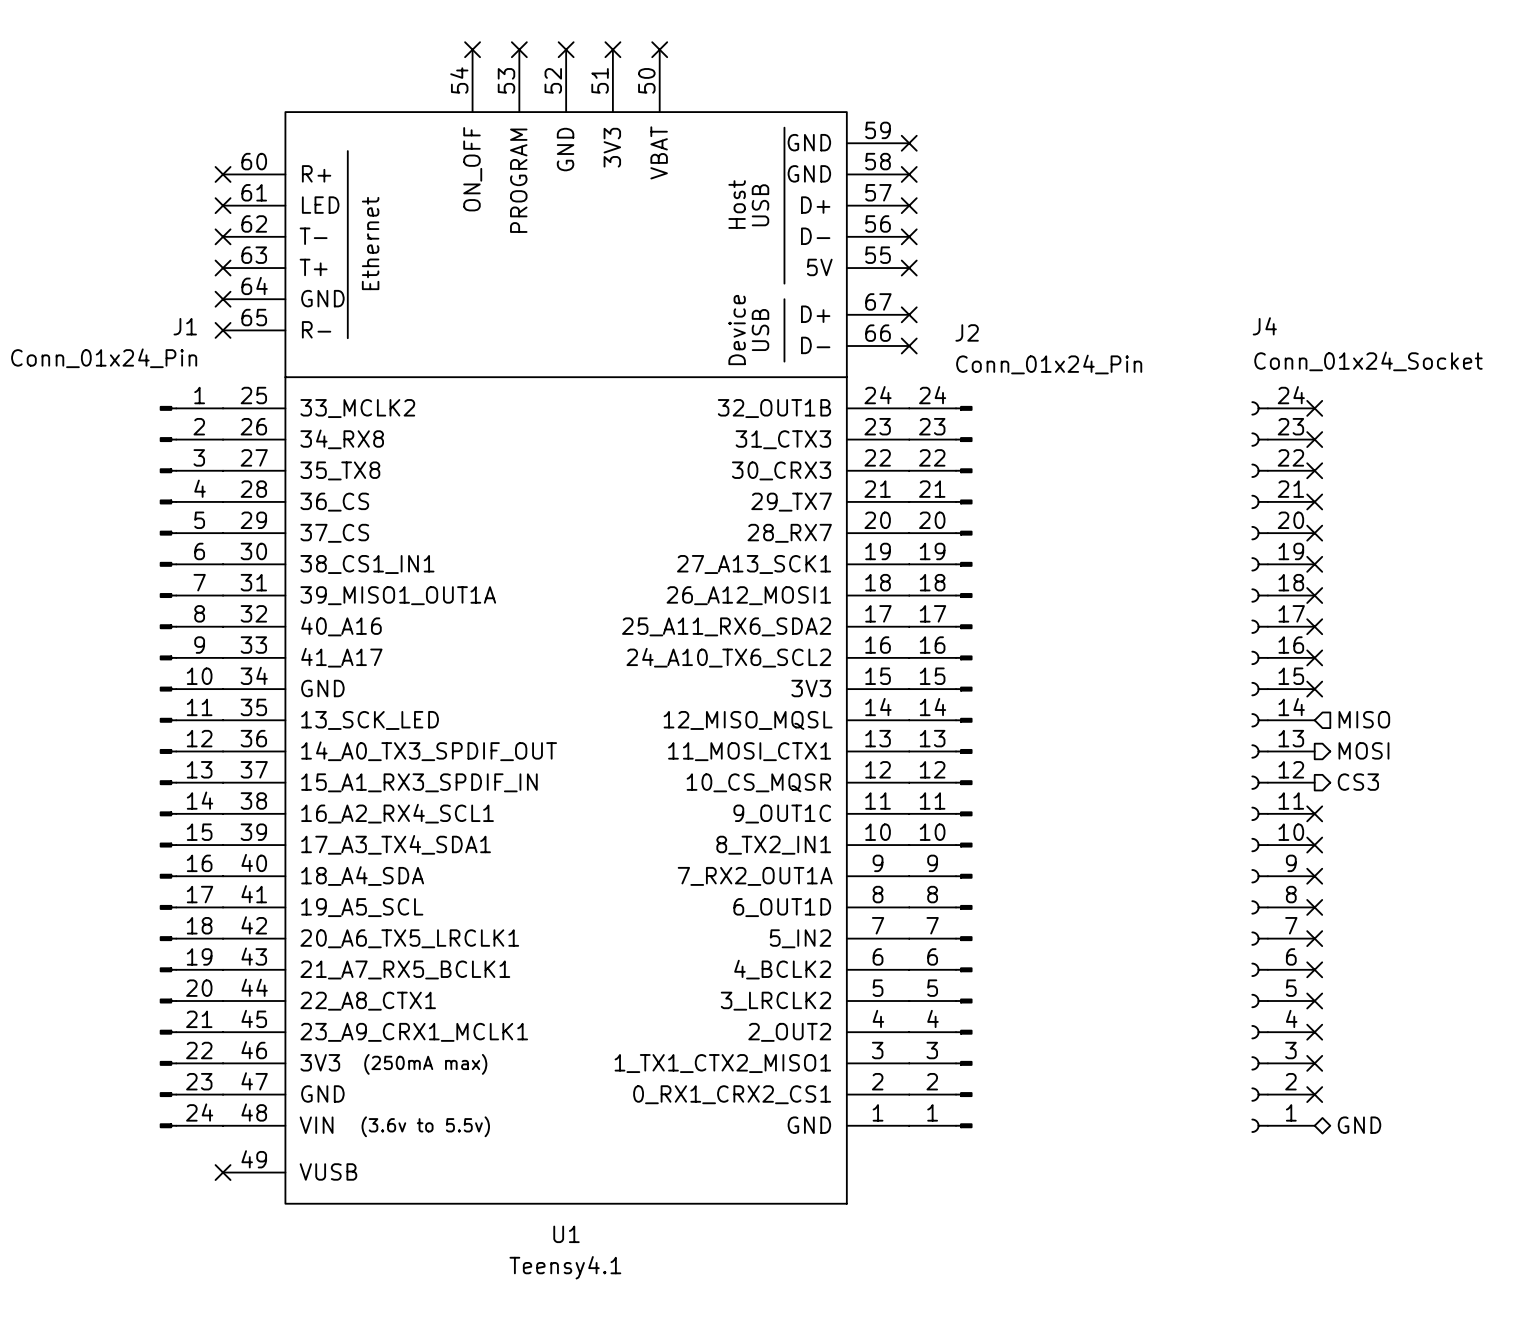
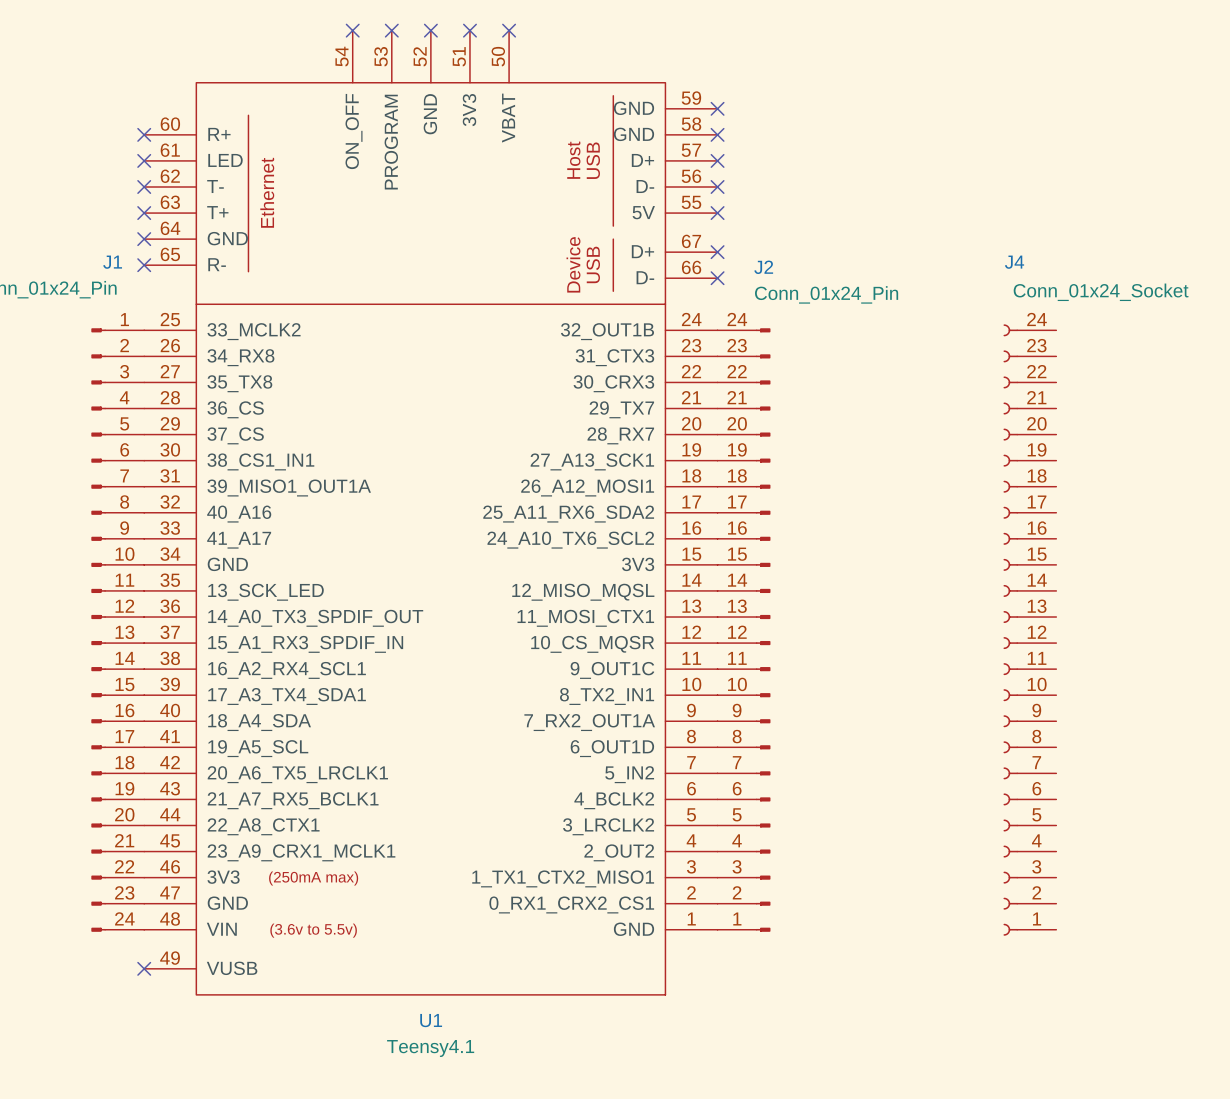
no-connect mark: (1314, 408) -> none
no-connect mark: (1314, 439) -> none
no-connect mark: (1314, 470) -> none
no-connect mark: (1314, 501) -> none
no-connect mark: (1314, 533) -> none
no-connect mark: (1314, 564) -> none
no-connect mark: (1314, 595) -> none
no-connect mark: (1314, 626) -> none
no-connect mark: (1314, 657) -> none
no-connect mark: (1314, 689) -> none
hierarchical label: MISO (1364, 719) -> none
hierarchical label: MOSI (1363, 750) -> none
hierarchical label: CS3 (1358, 782) -> none
no-connect mark: (1314, 813) -> none
no-connect mark: (1314, 845) -> none
no-connect mark: (1314, 876) -> none
no-connect mark: (1314, 907) -> none
no-connect mark: (1314, 938) -> none
no-connect mark: (1314, 969) -> none
no-connect mark: (1314, 1001) -> none
no-connect mark: (1314, 1032) -> none
no-connect mark: (1314, 1063) -> none
no-connect mark: (1314, 1094) -> none
hierarchical label: GND (1359, 1125) -> none

